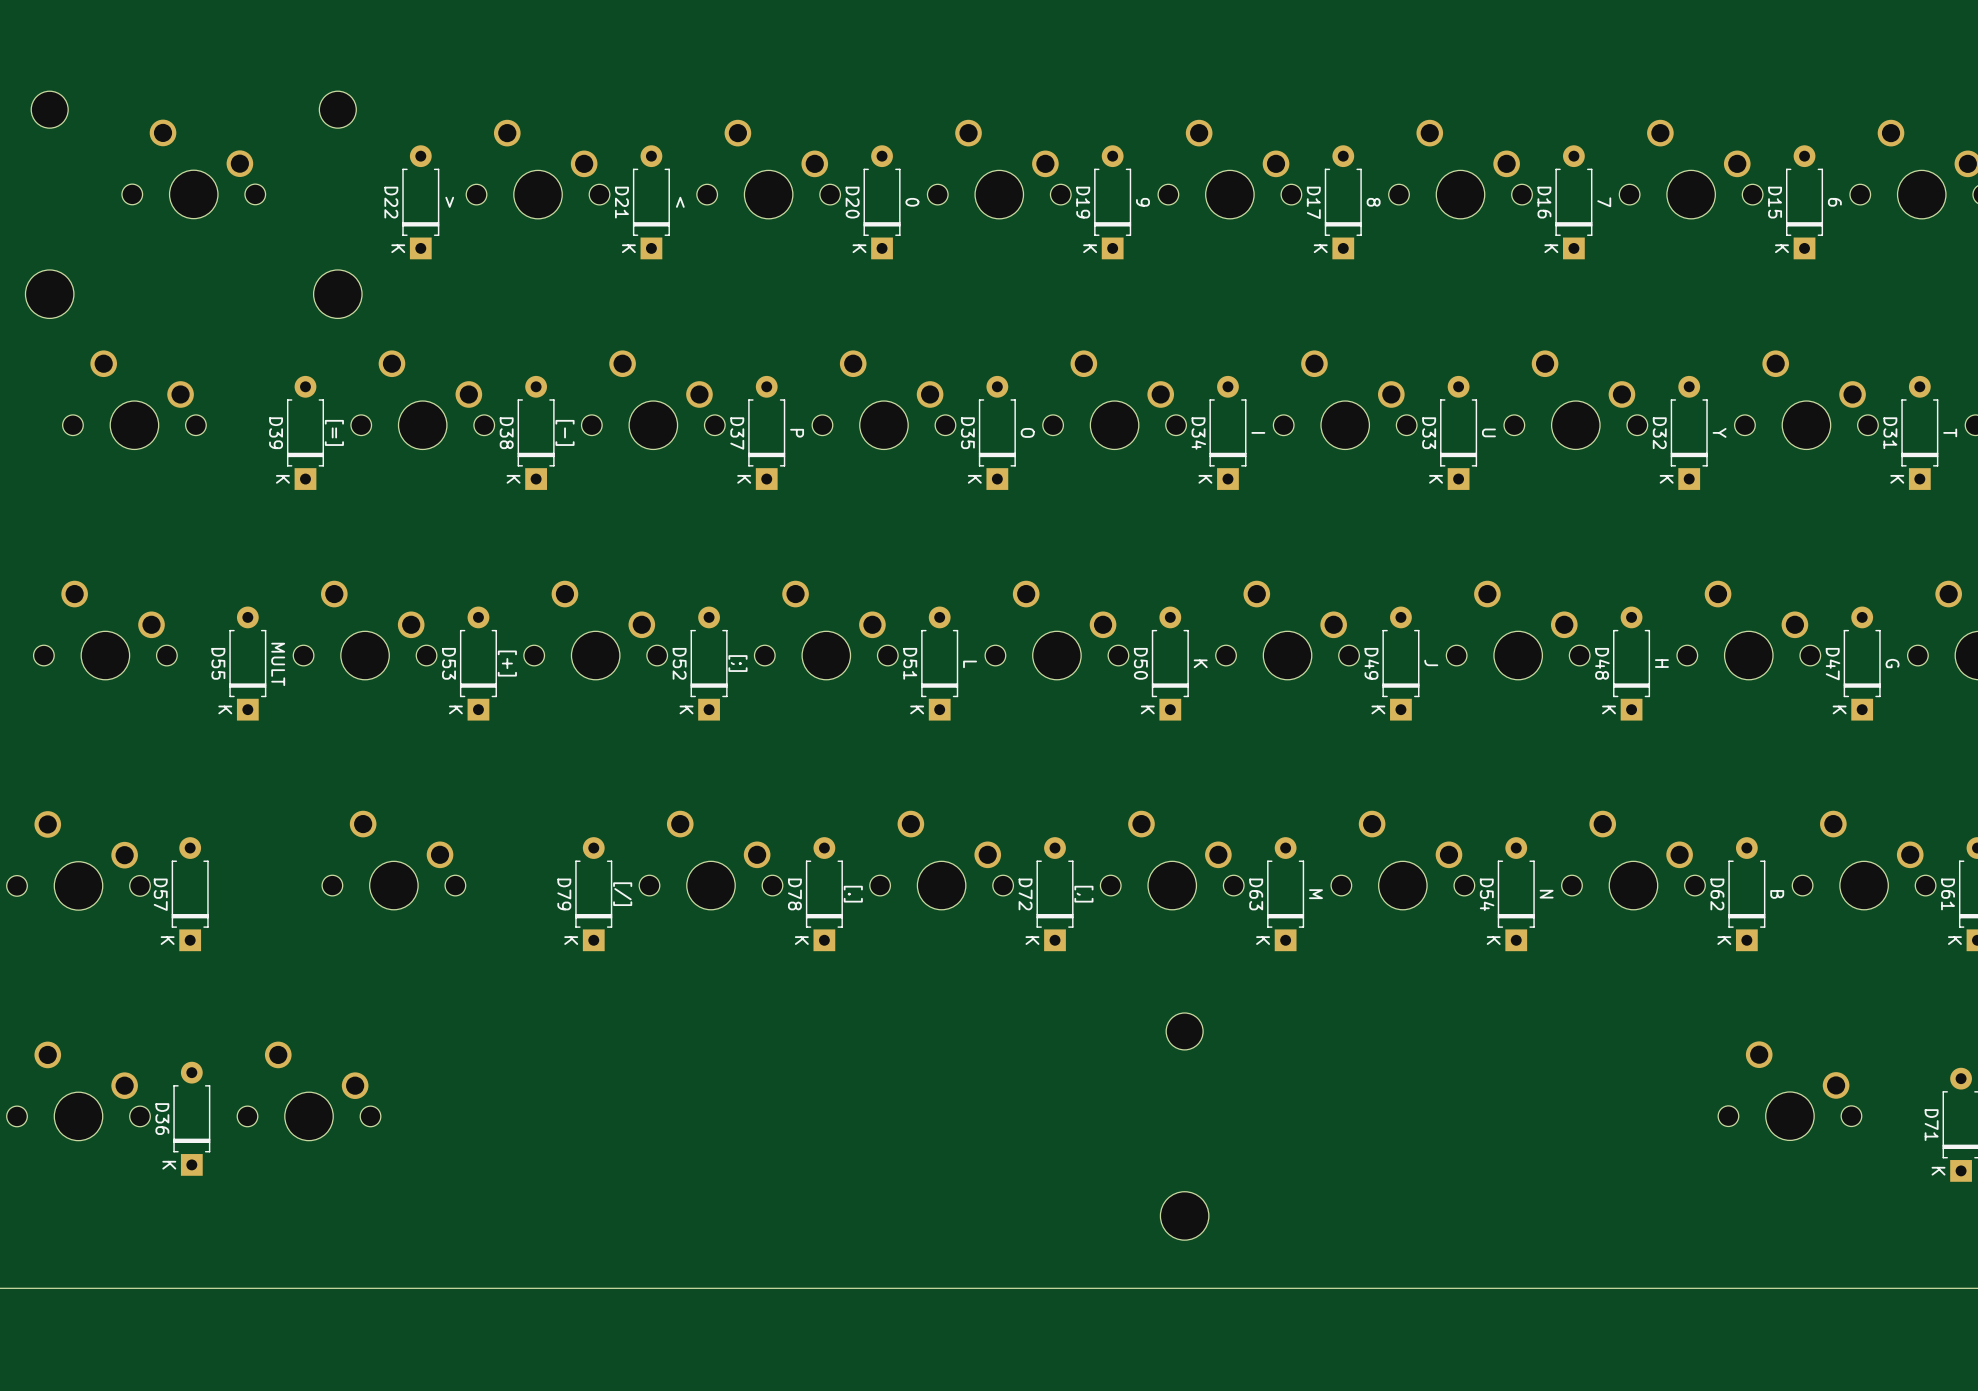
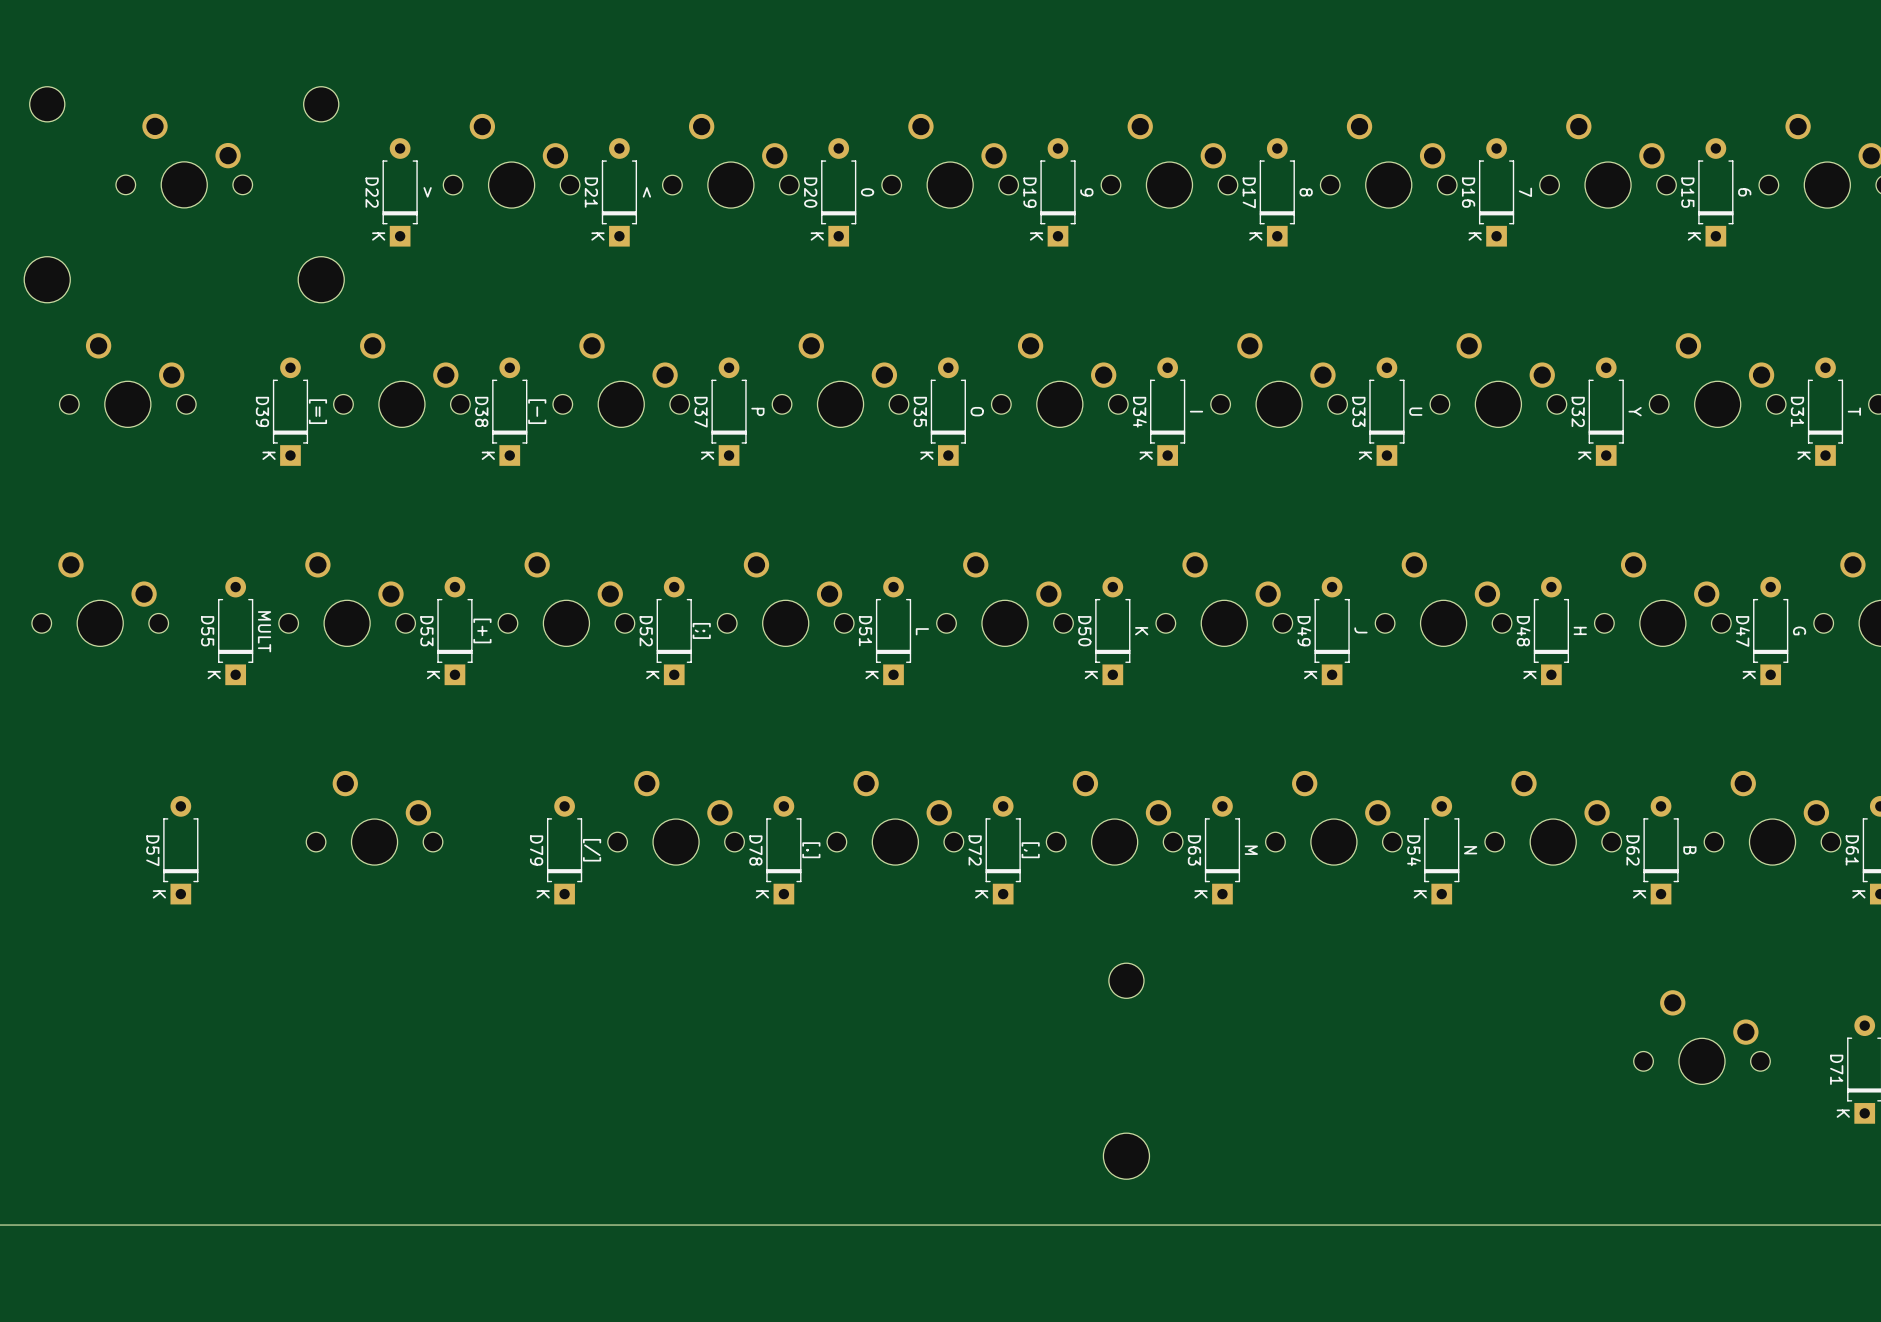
part: (78, 860) -> none
part: (78, 1091) -> none
part: (309, 1091) -> none
D36: (191, 1118) -> none

